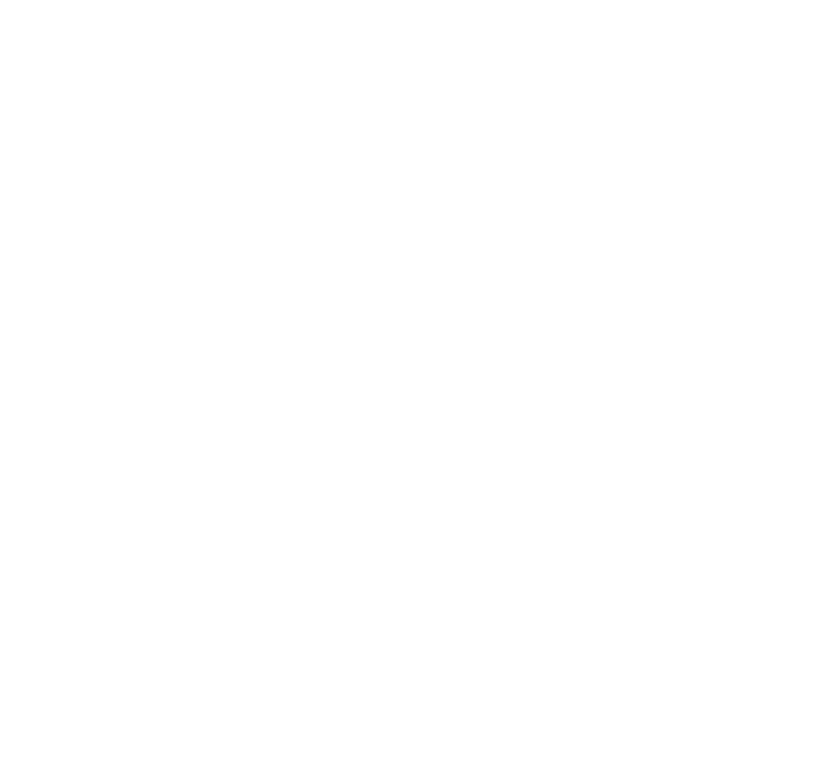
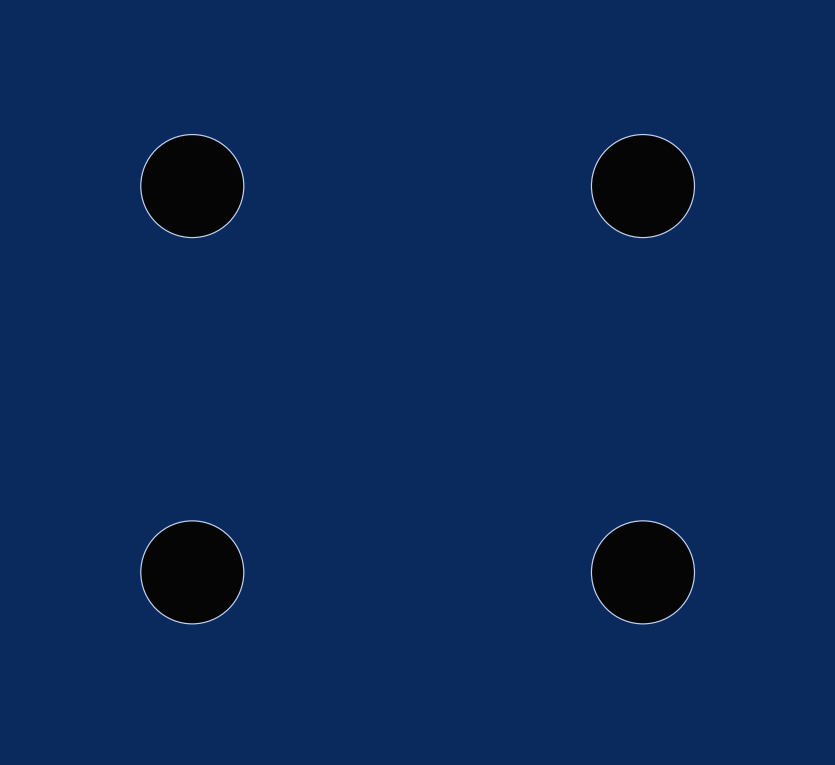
part: none -> (192, 186)
part: none -> (642, 186)
part: none -> (192, 572)
part: none -> (642, 572)

